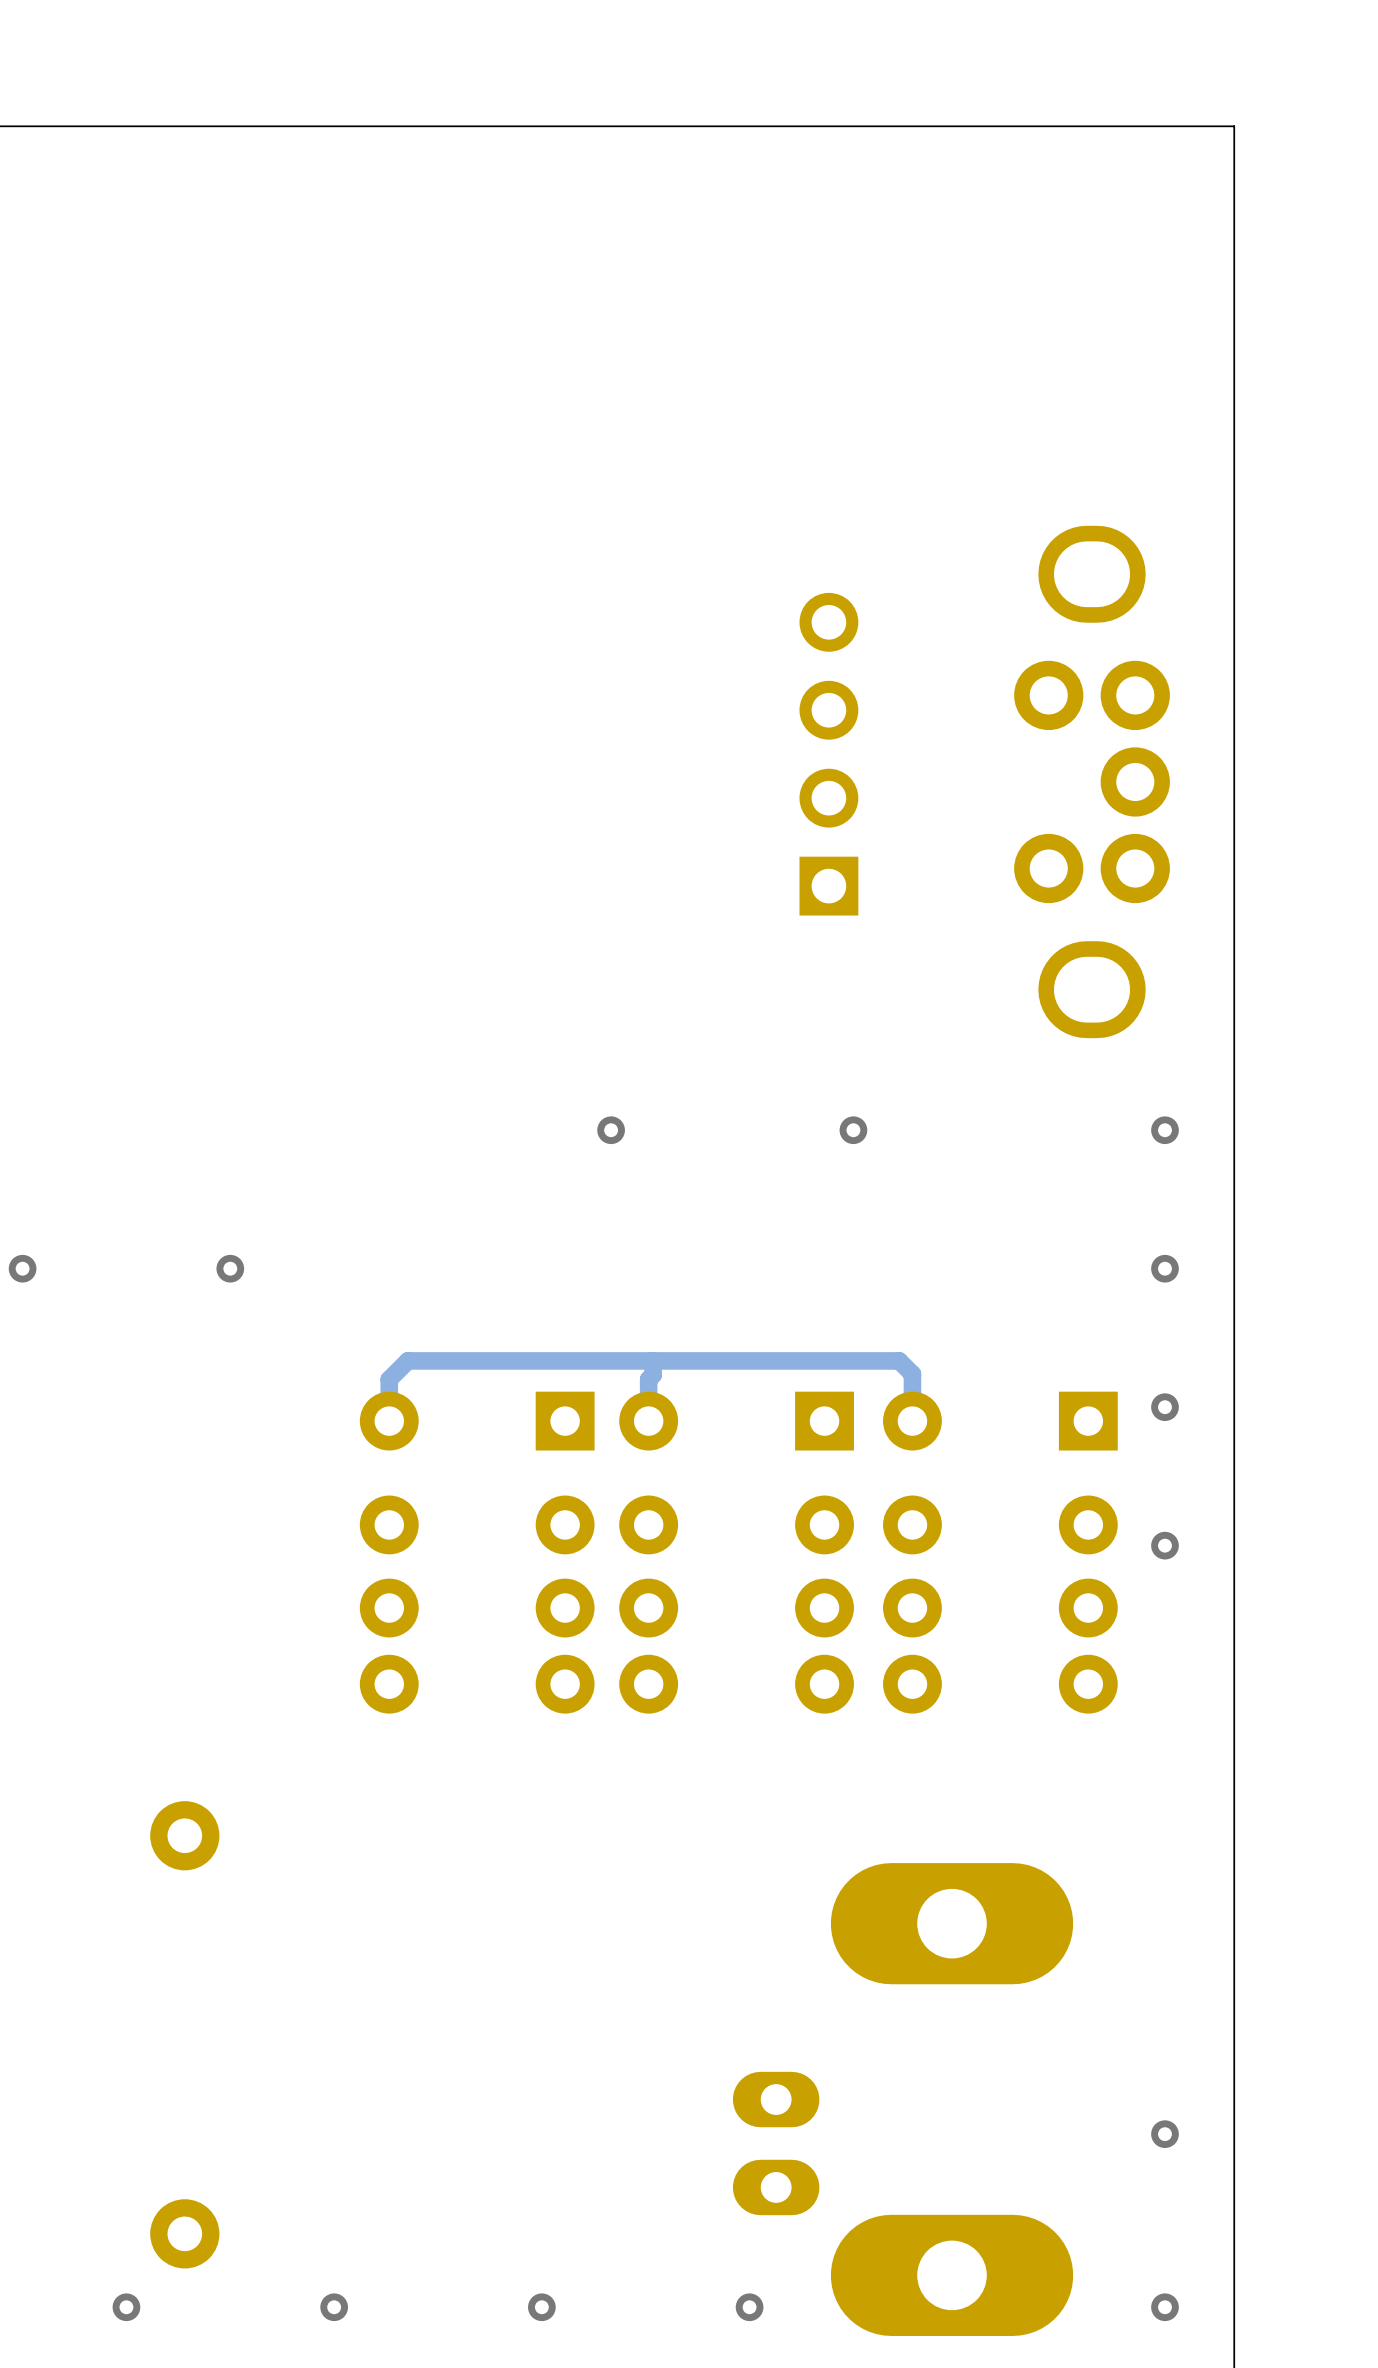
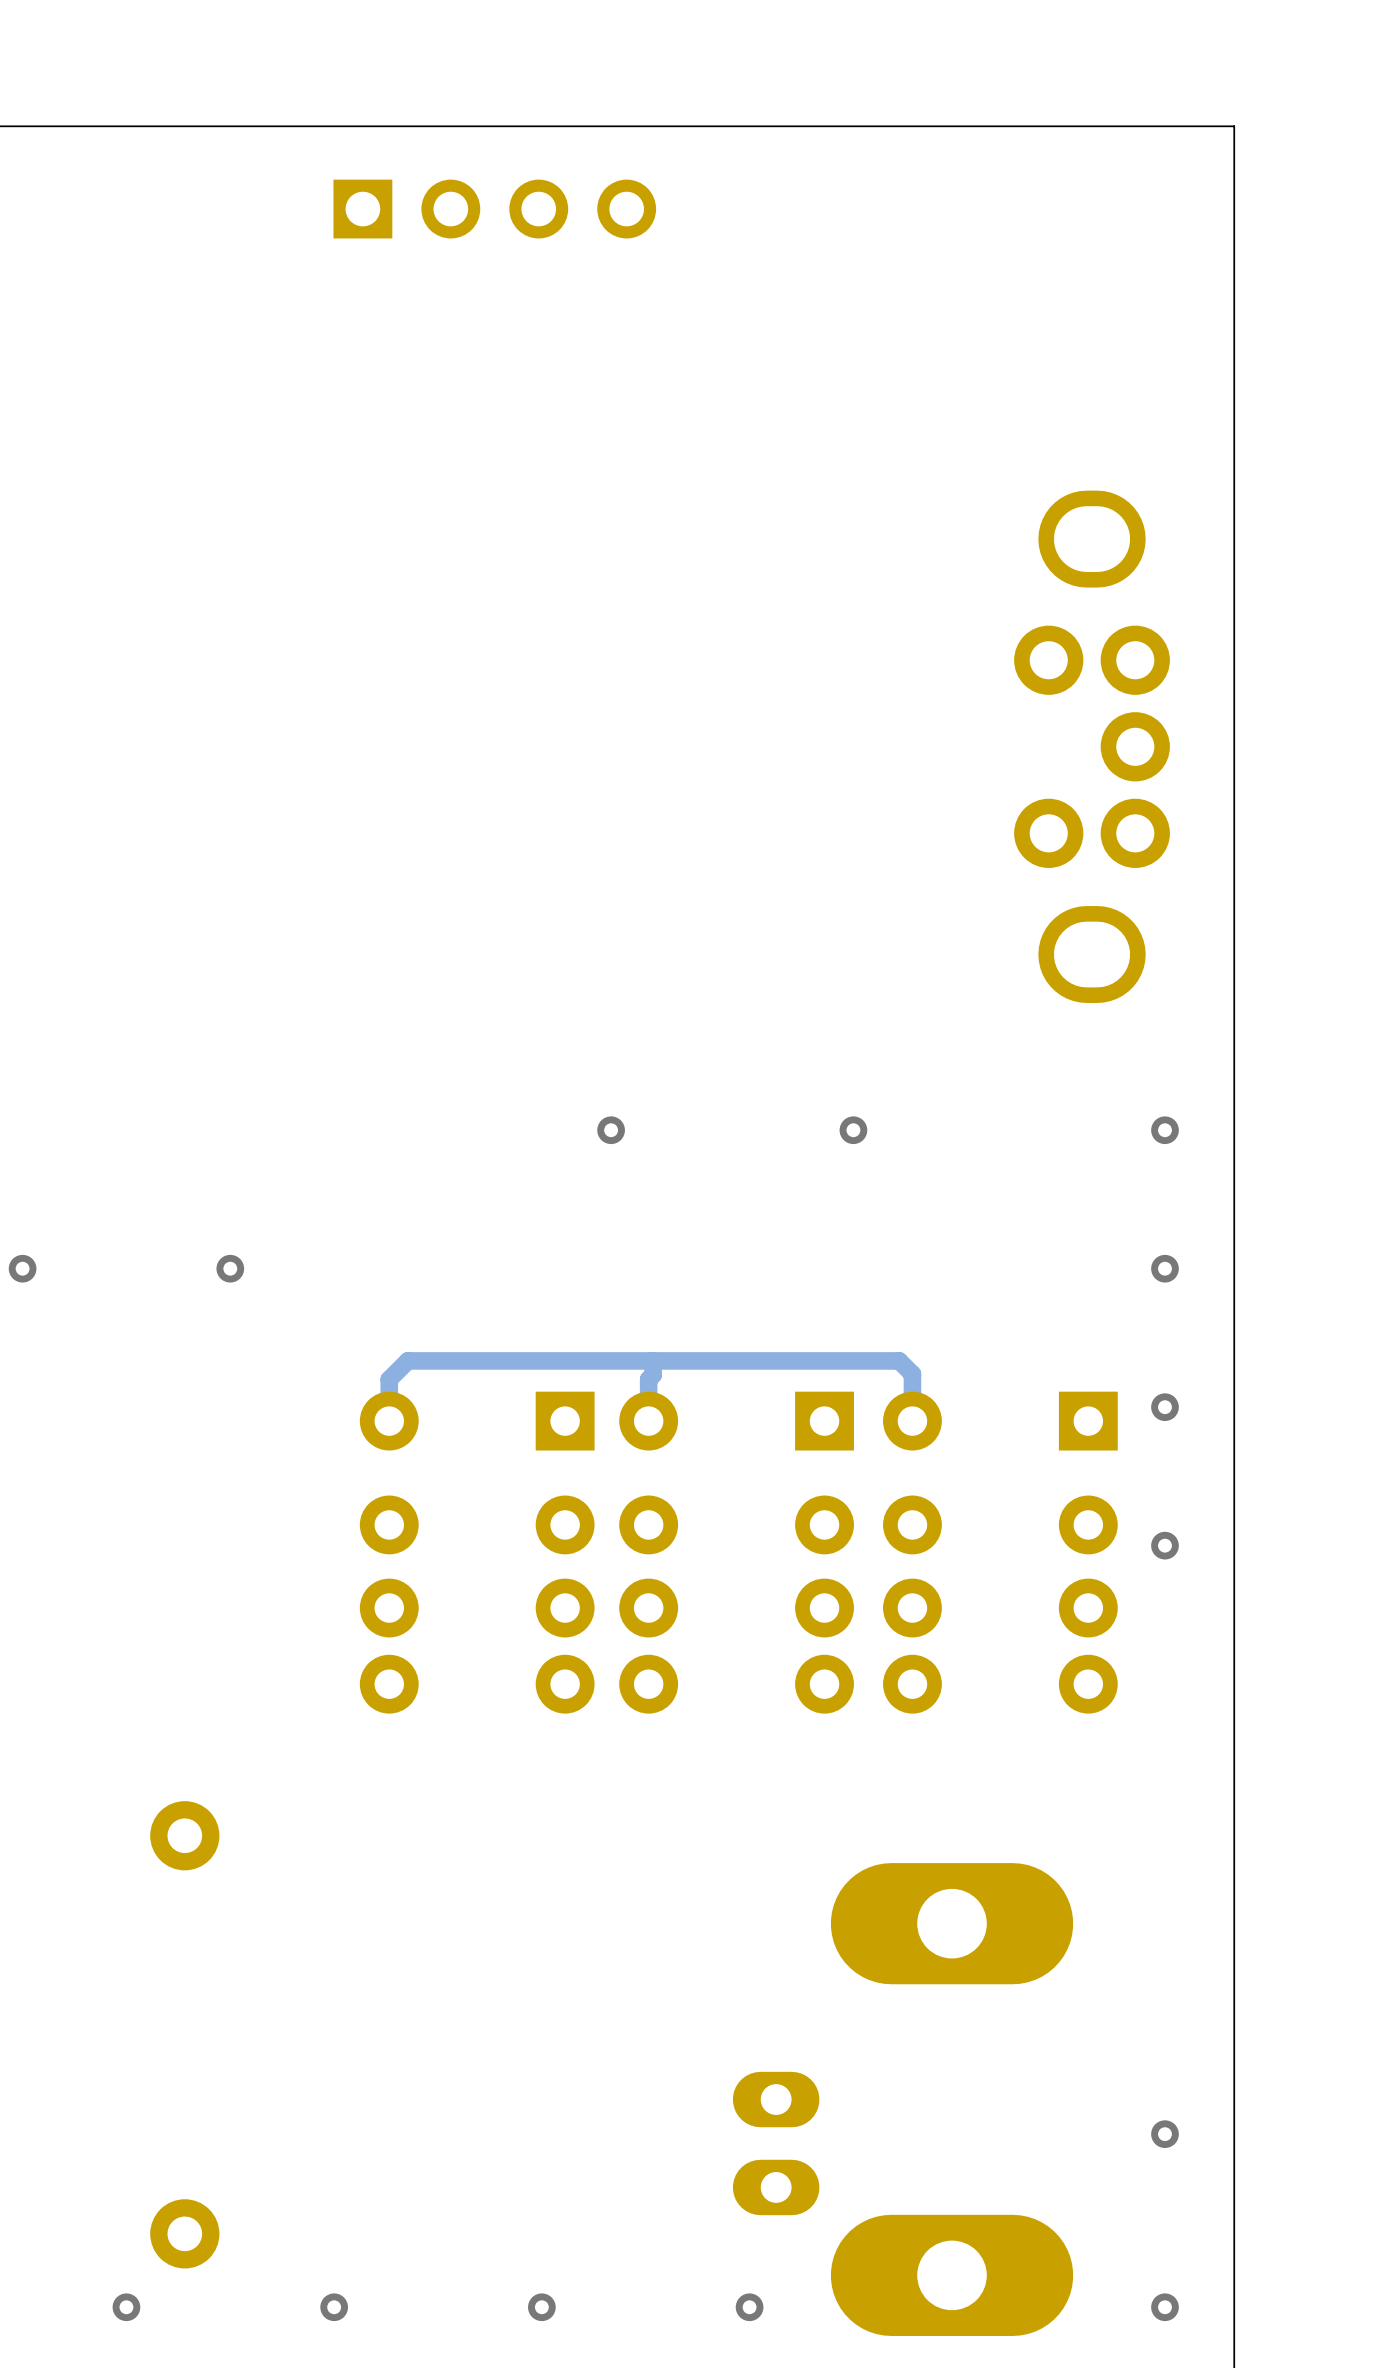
part rotation: 0° (828, 754) -> 90° clockwise (494, 209)
part position: (828, 754) -> (494, 209)
part position: (1092, 781) -> (1092, 746)

